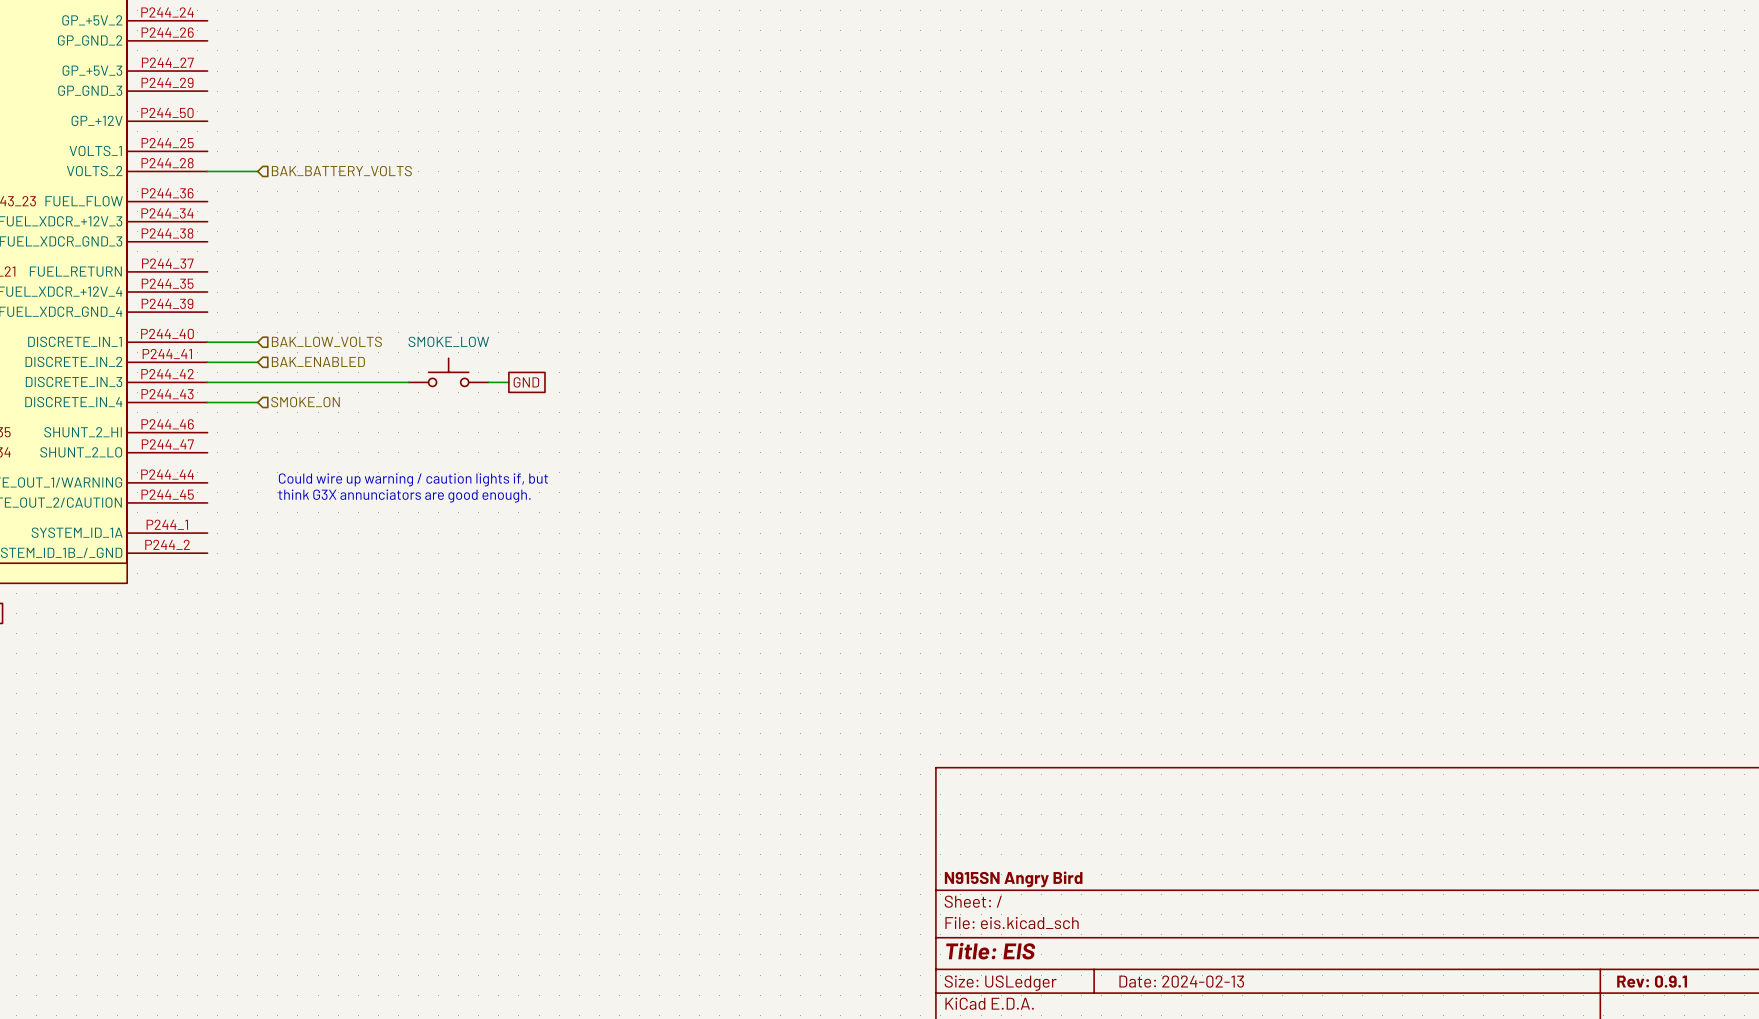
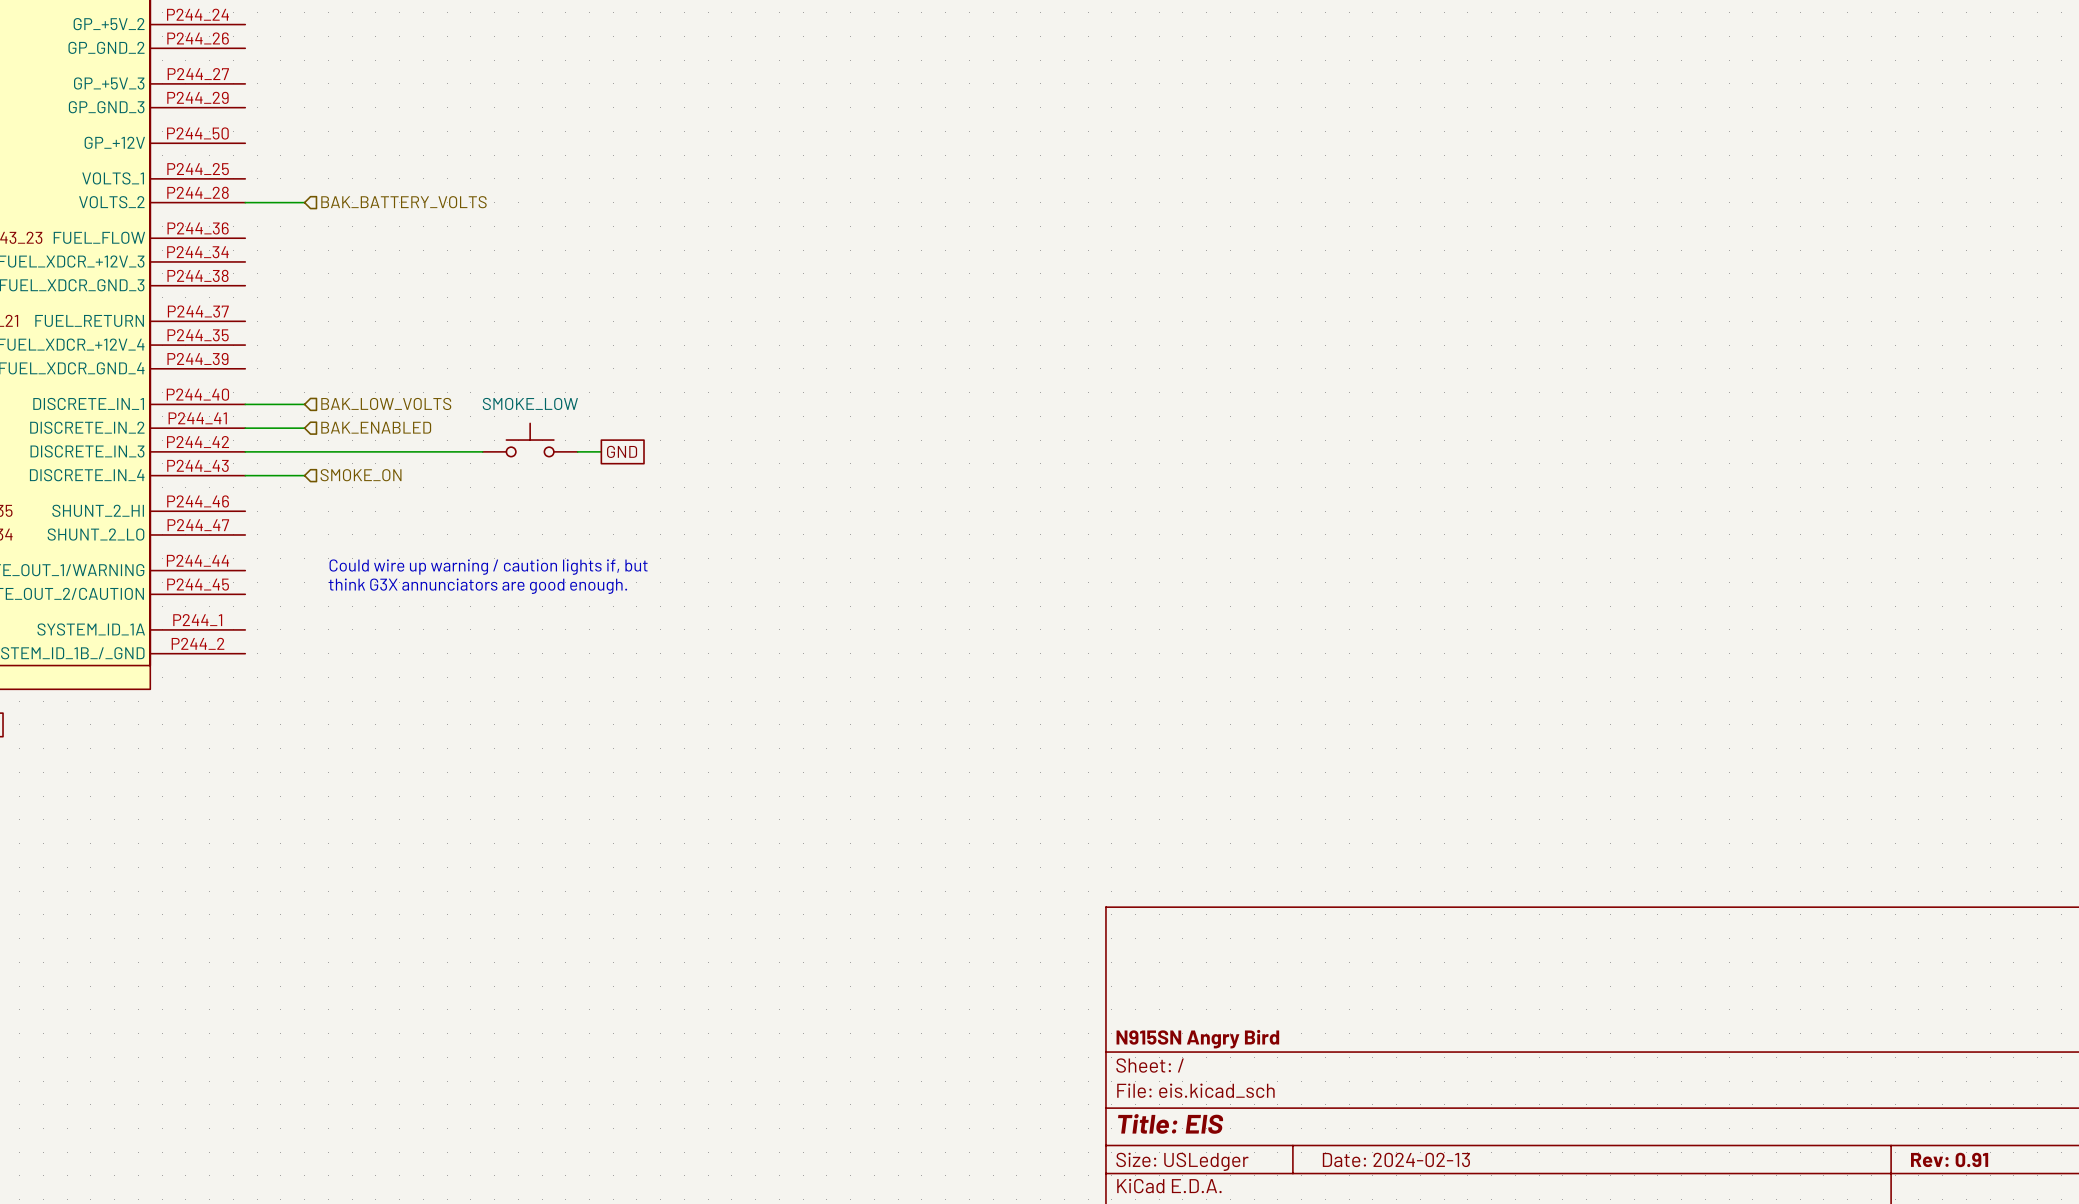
title block: Rev: 0.9.1 (1652, 981) -> Rev: 0.91 (1949, 1159)

